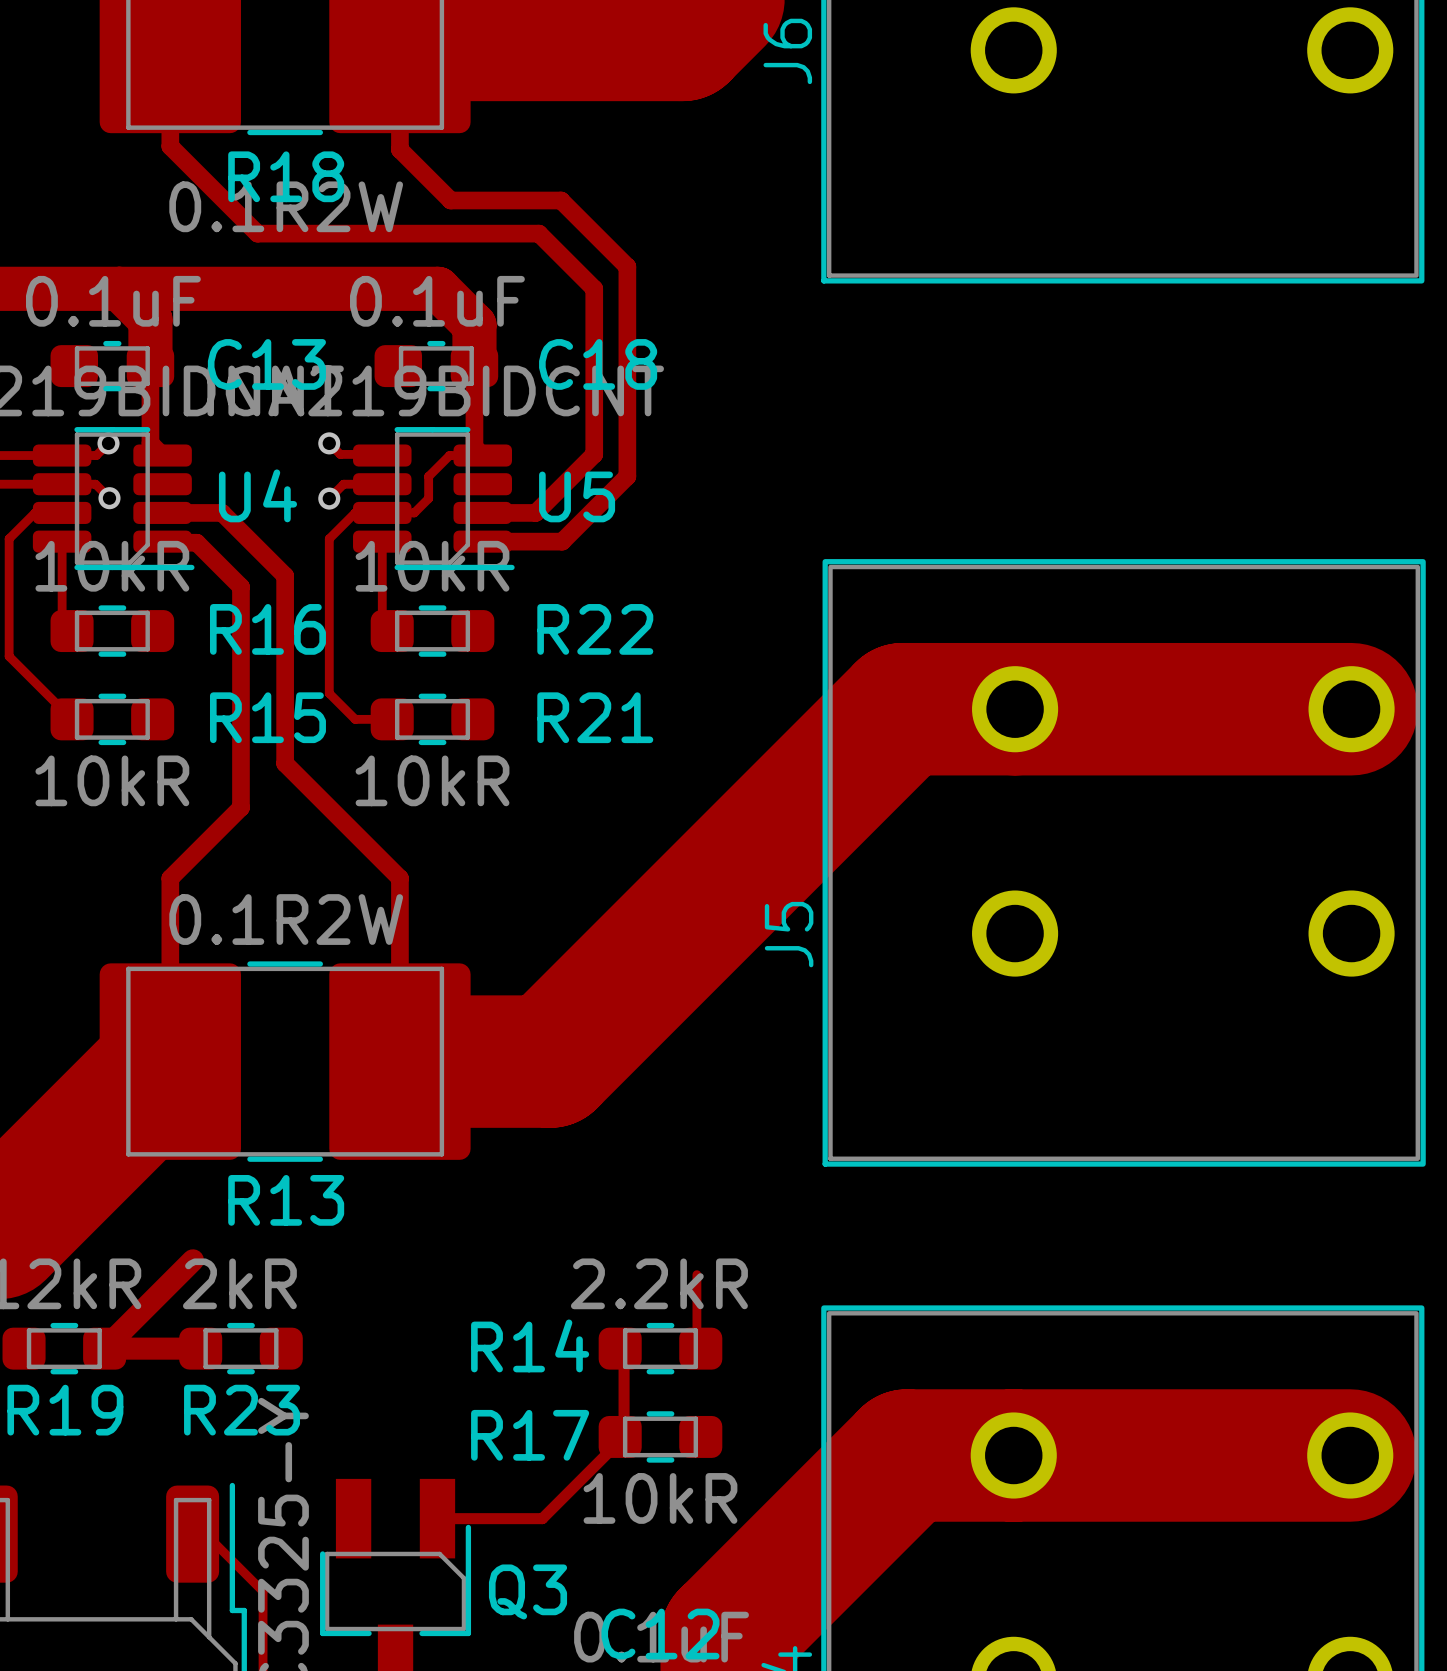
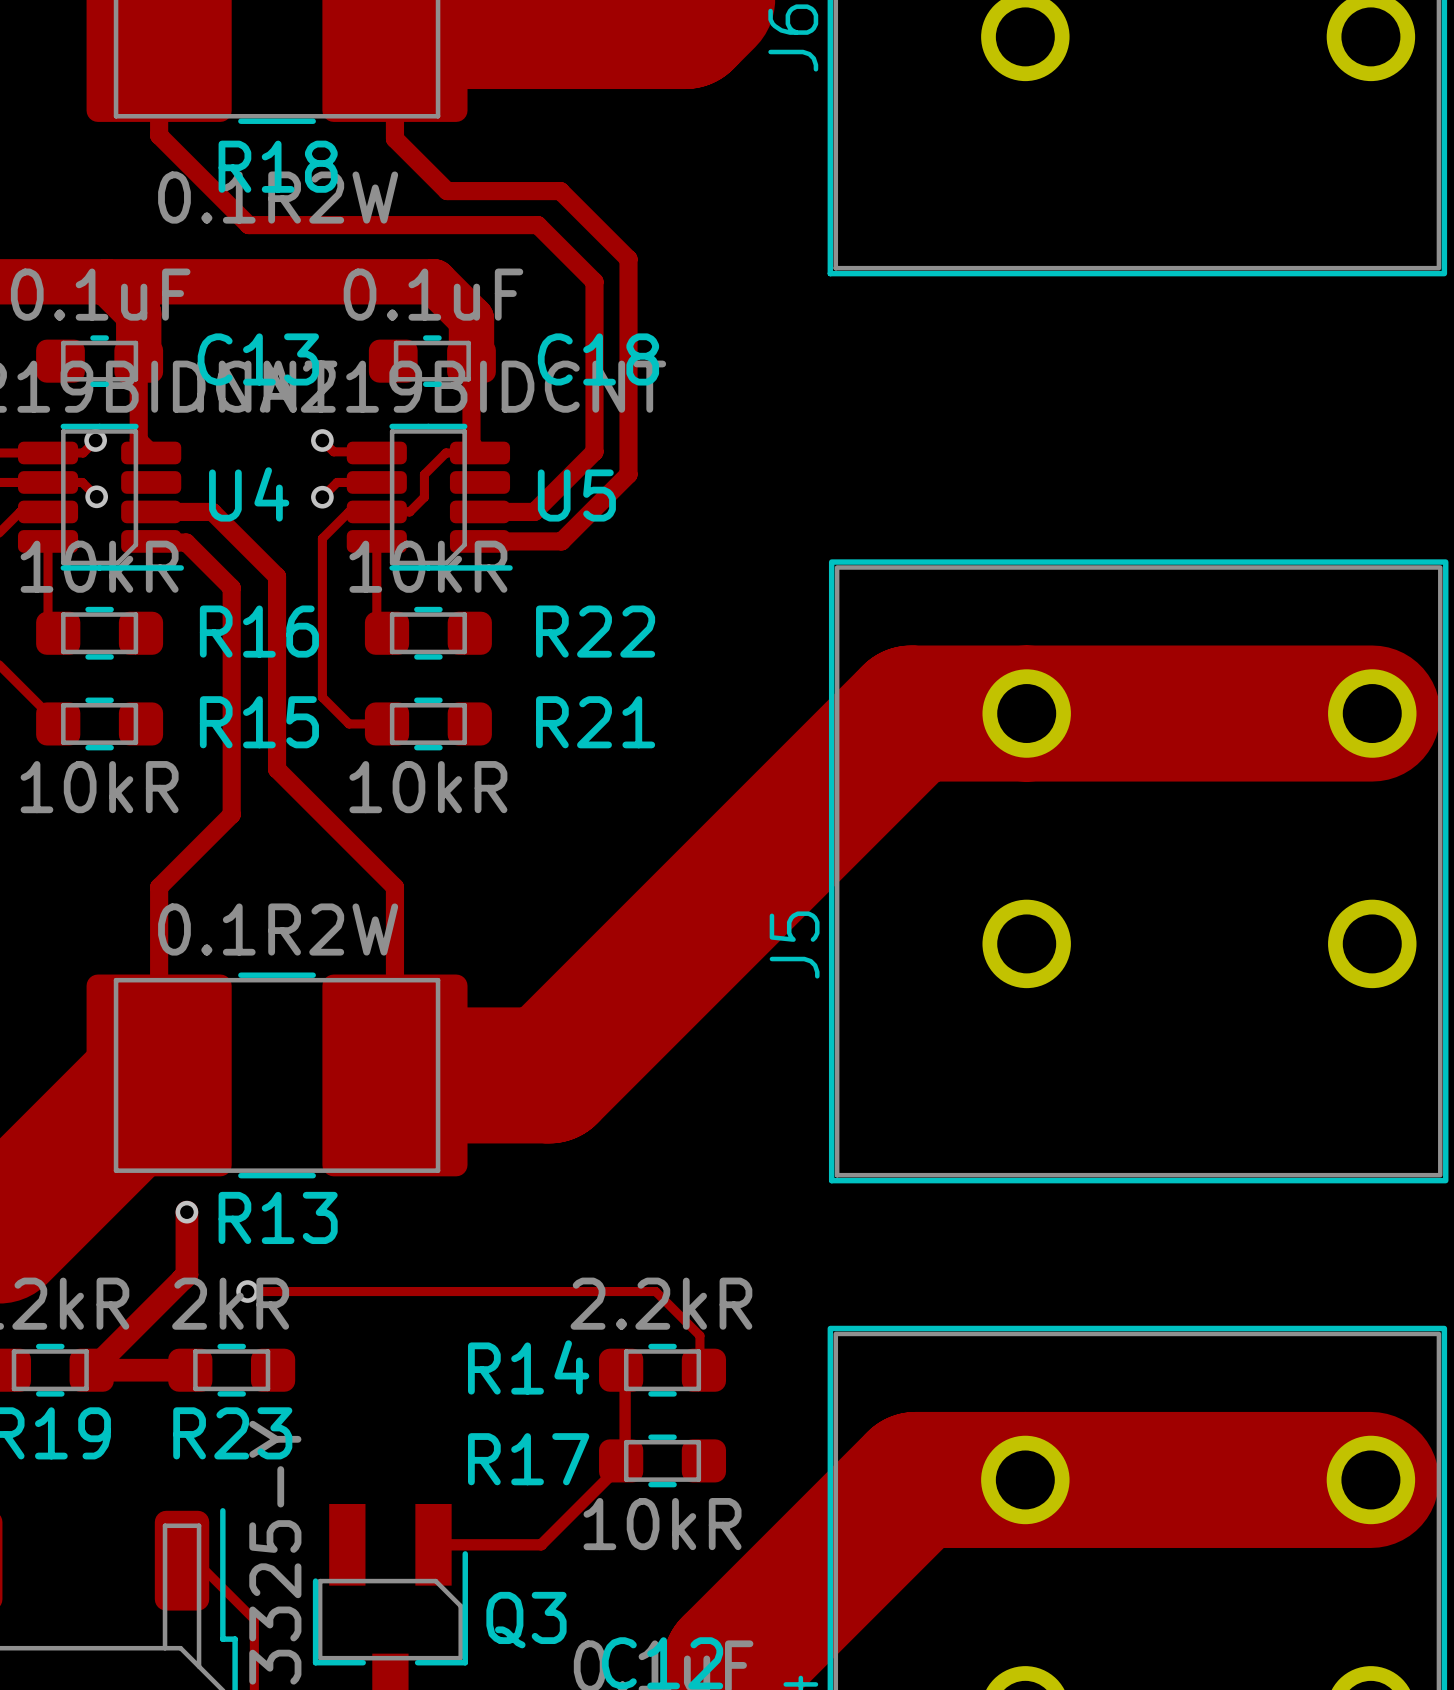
track: none -> (186, 1212) (186, 1274) (182, 1279)
via: none -> (186, 1212)
via: none -> (247, 1291)
track: (696, 1274) (696, 1315) -> (247, 1291) (655, 1291) (699, 1335)

